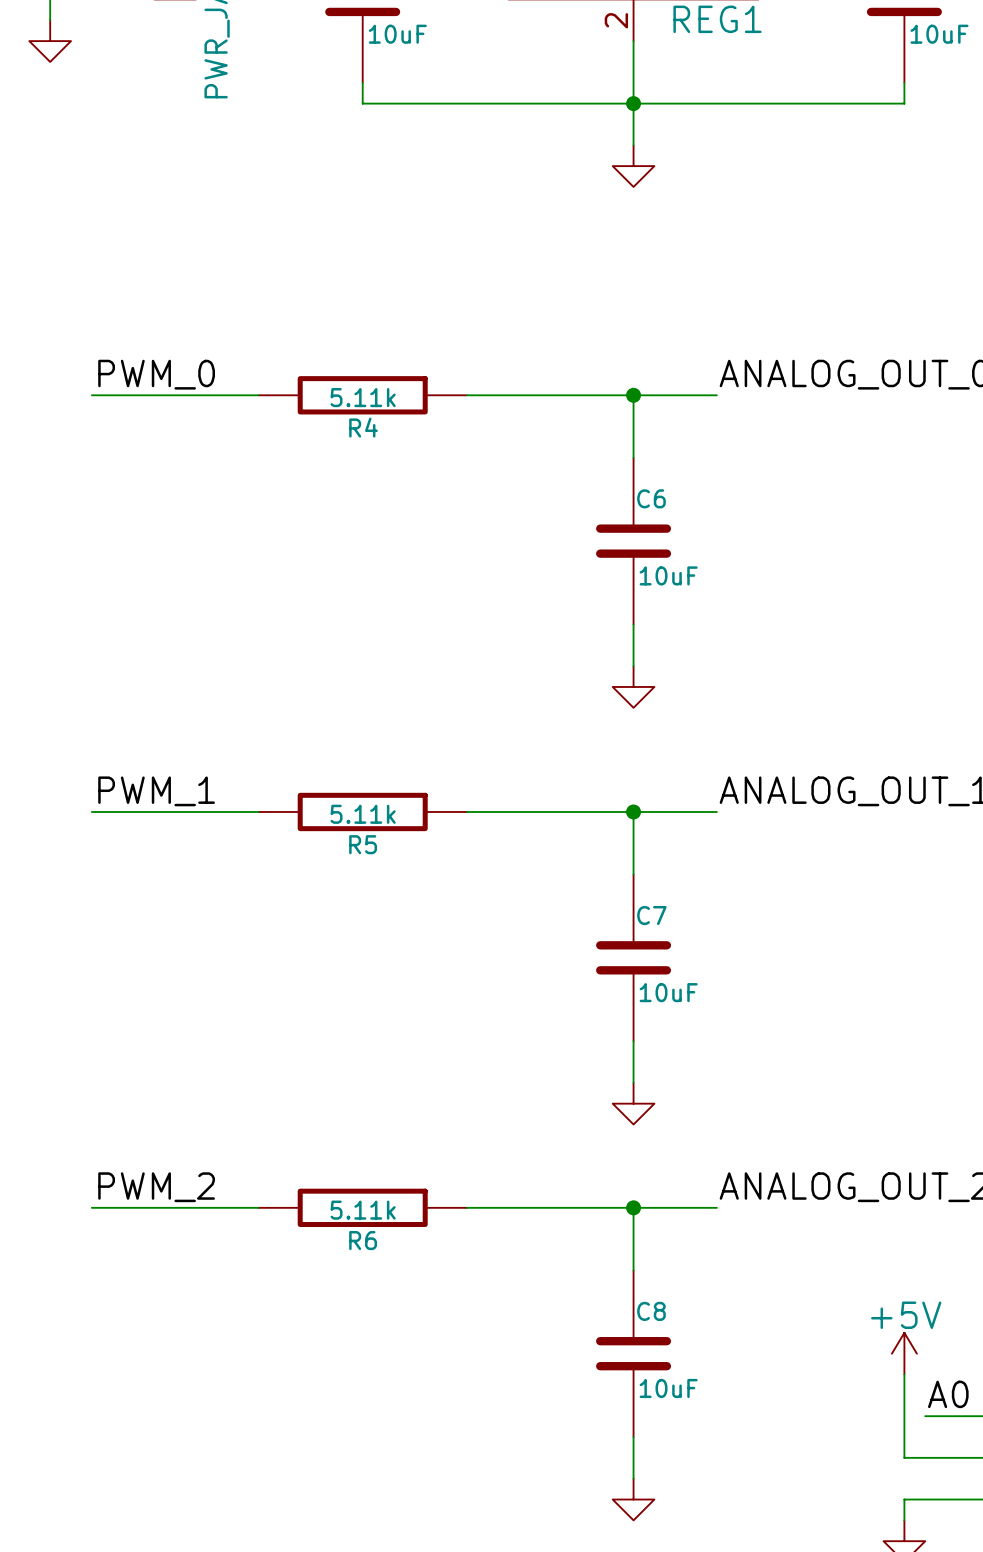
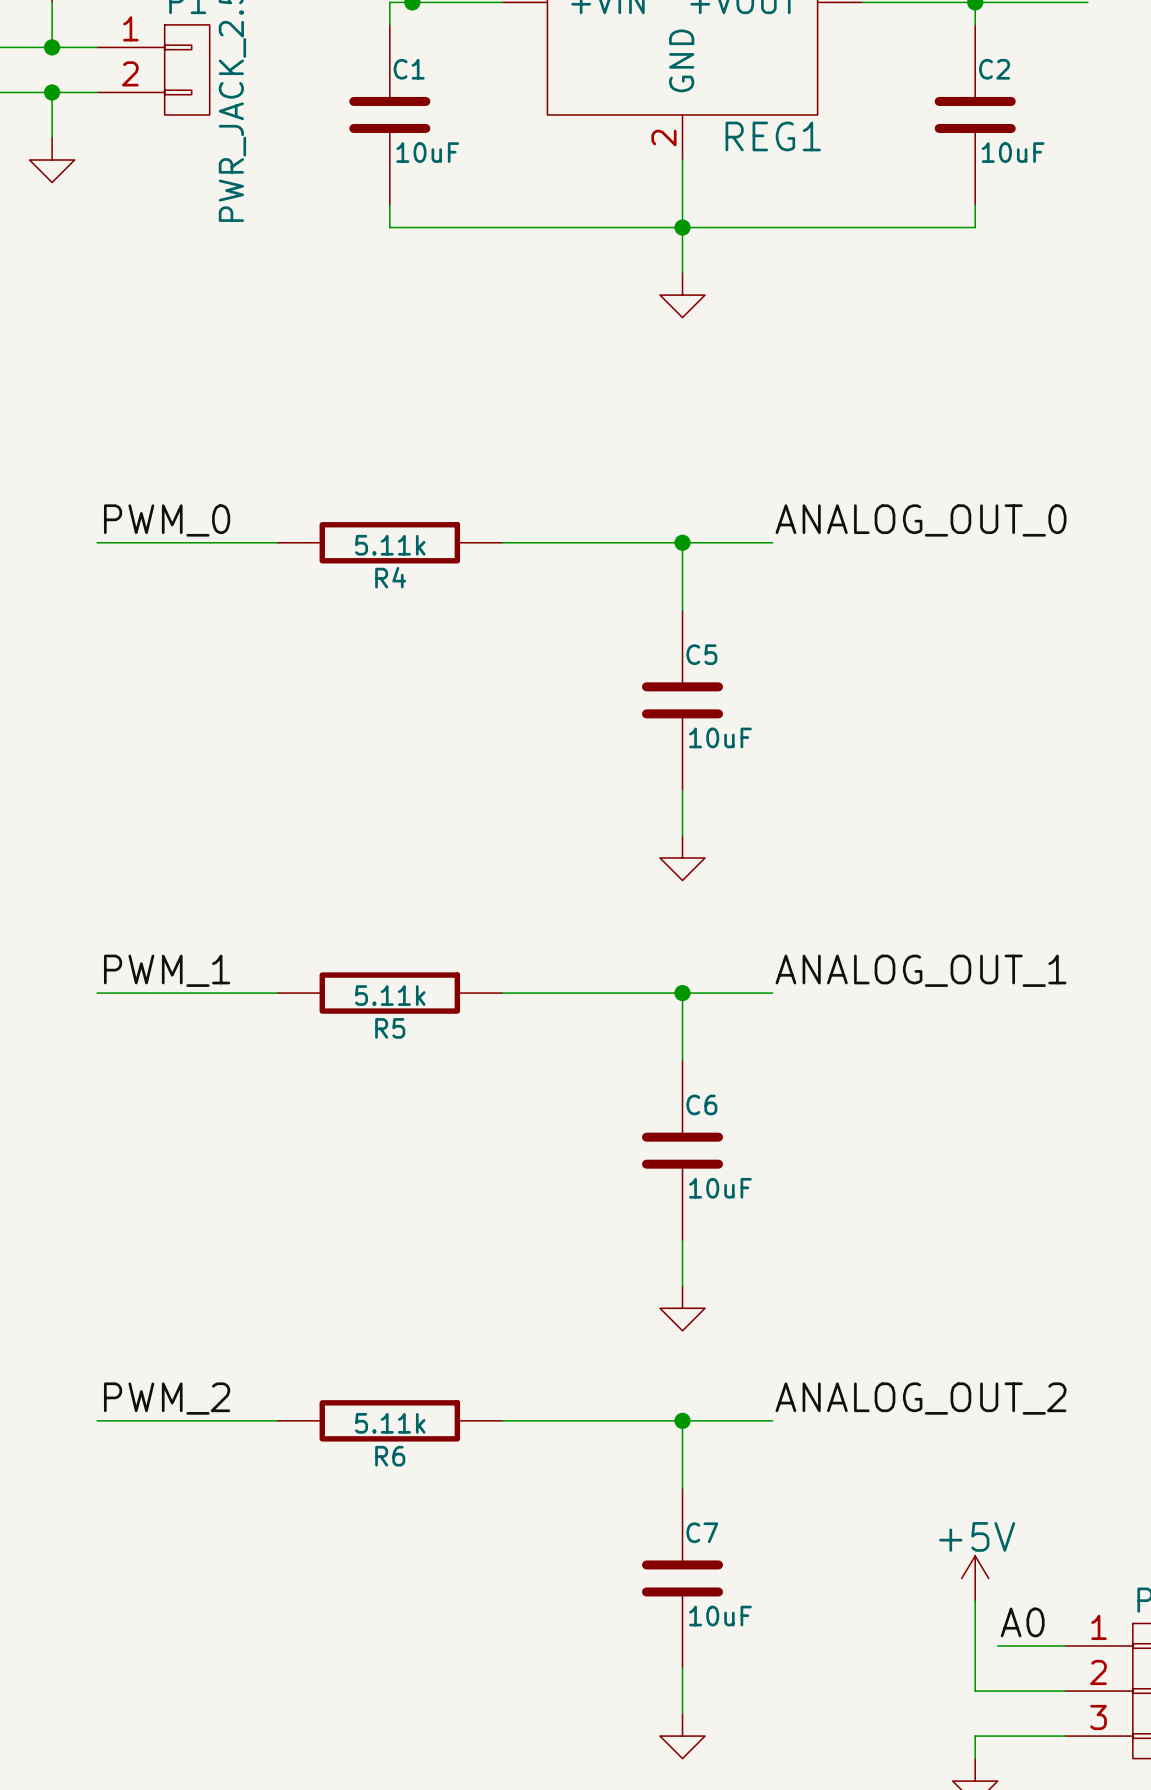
C6 name: C6 (651, 498) -> C5 (701, 654)
C7 name: C7 (651, 915) -> C6 (701, 1104)
C8 name: C8 (651, 1311) -> C7 (702, 1532)

